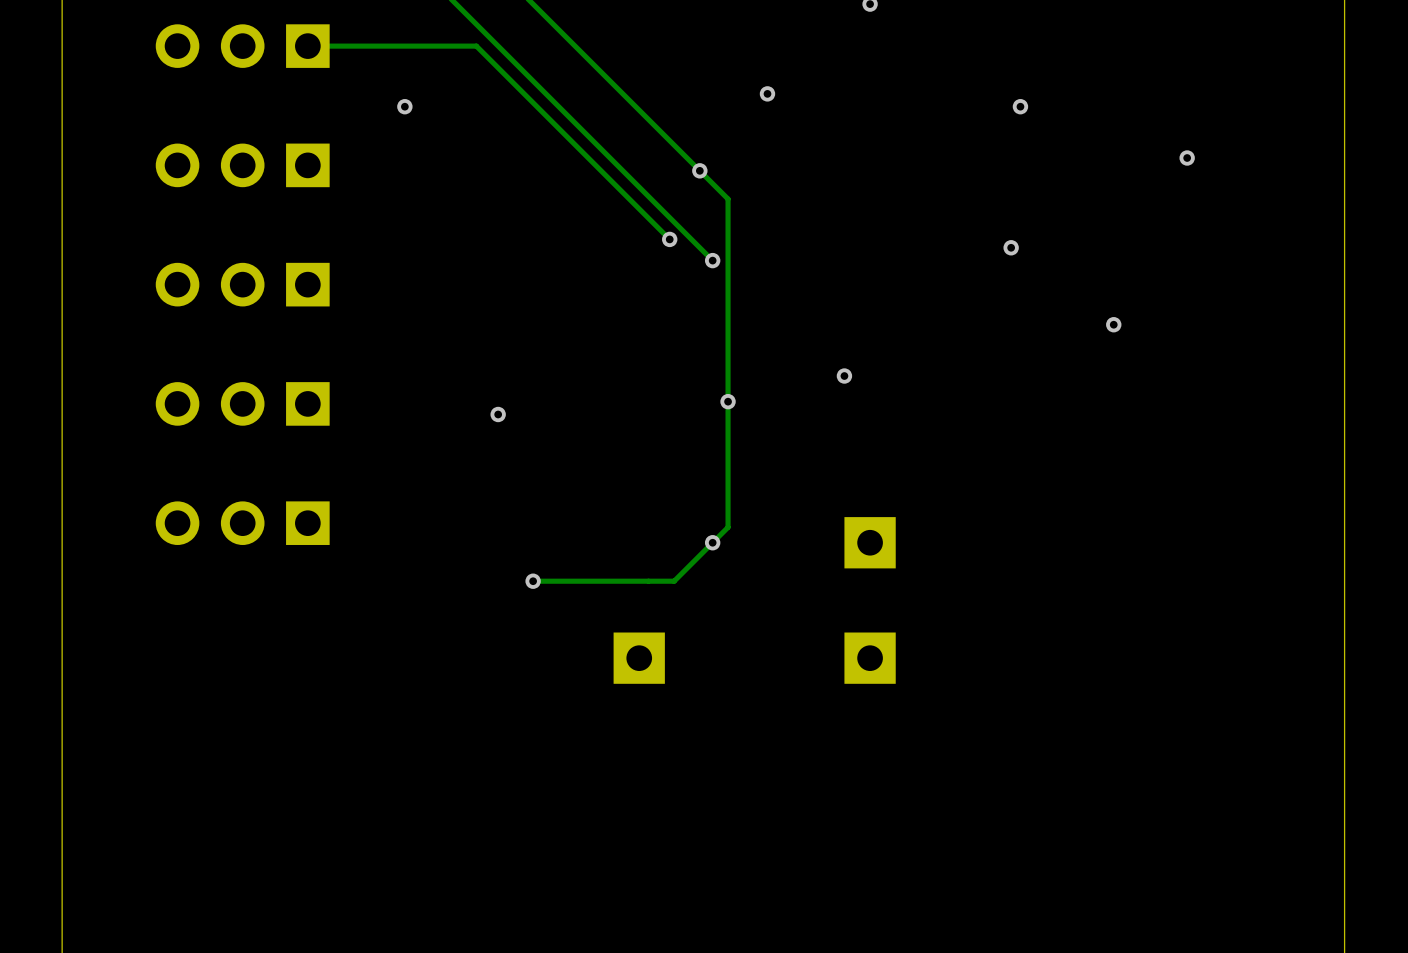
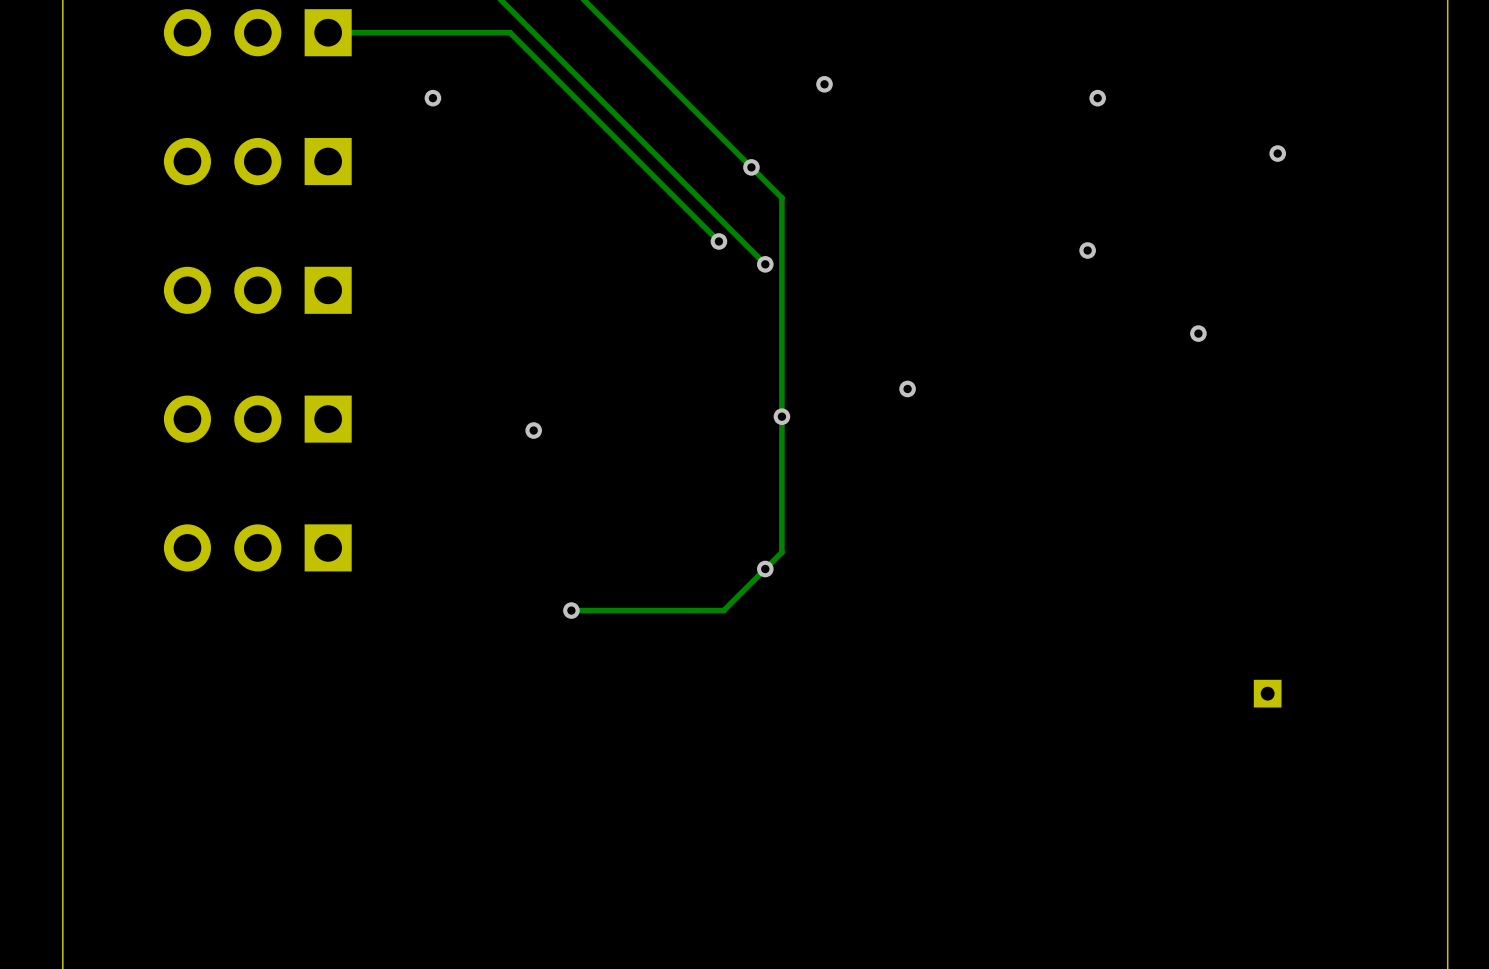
part: (870, 542) -> none
part: (639, 658) -> none
part: (870, 658) -> none
part: none -> (1267, 693)

